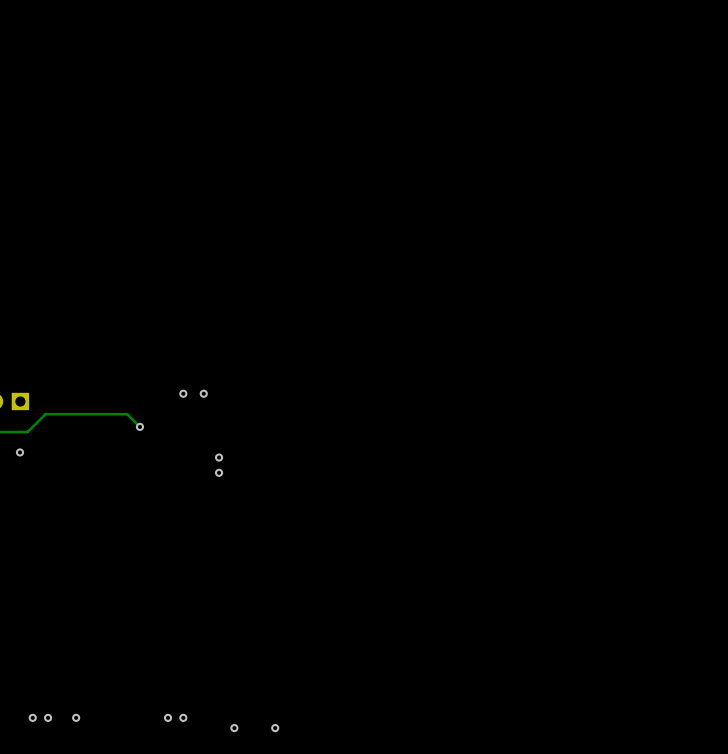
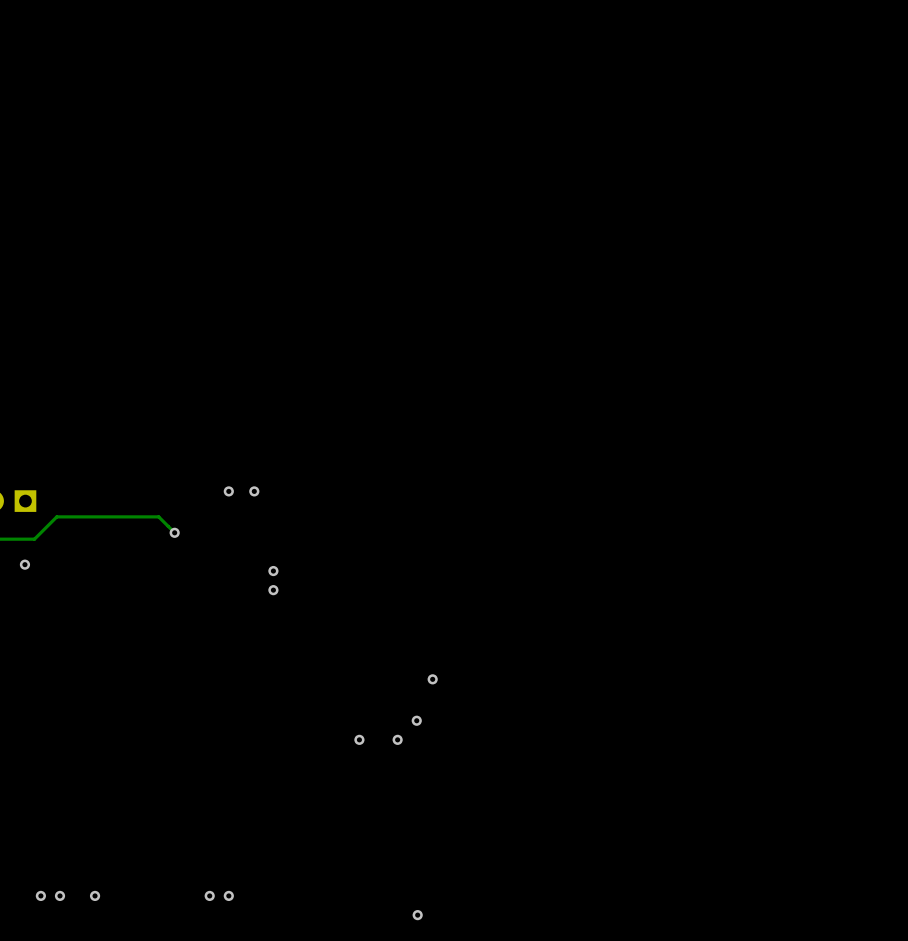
via: none -> (432, 679)
via: none -> (416, 720)
via: none -> (359, 739)
via: none -> (397, 739)
via: (234, 728) -> none
via: (275, 728) -> none
via: none -> (417, 915)

